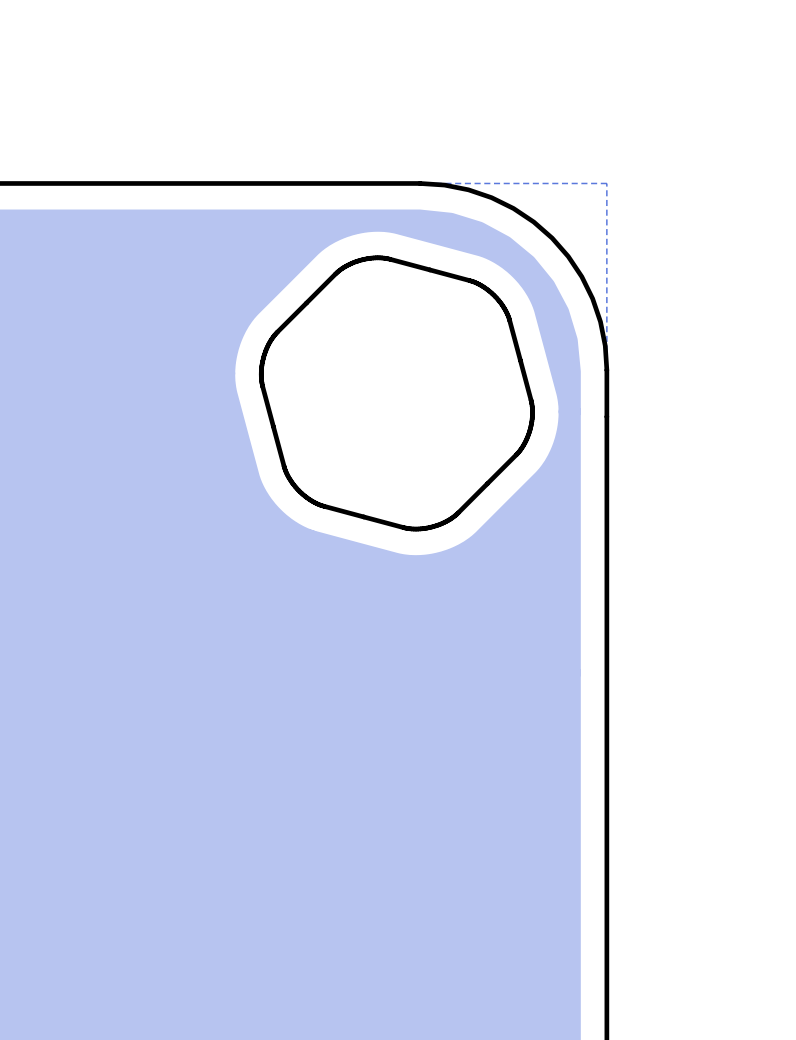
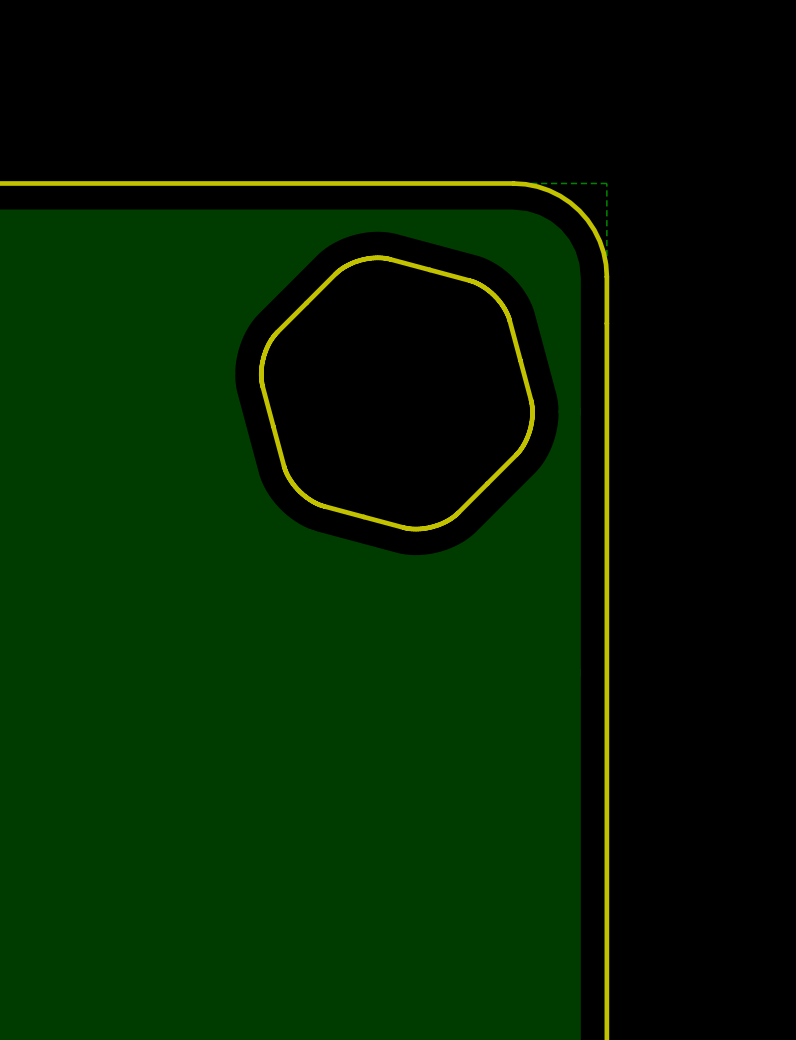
board edge: (420, 183) (444, 185) (468, 189) (491, 197) (513, 208) (533, 222) (552, 238) (568, 256) (581, 276) (592, 298) (600, 321) (605, 345) (606, 370) -> (420, 183) (525, 184) (549, 190) (570, 202) (579, 210) (594, 230) (603, 252) (606, 264) (606, 370)

